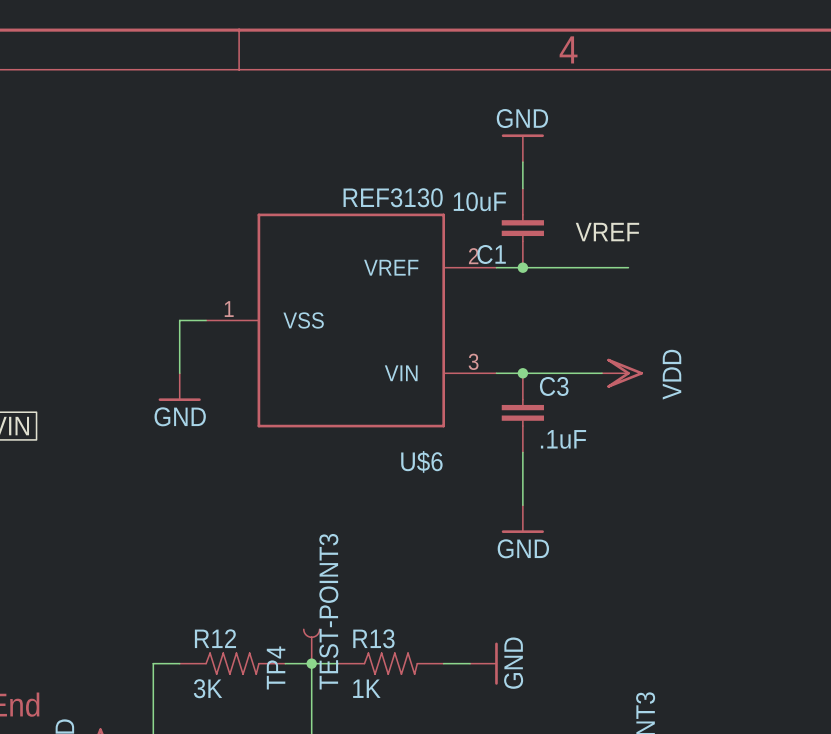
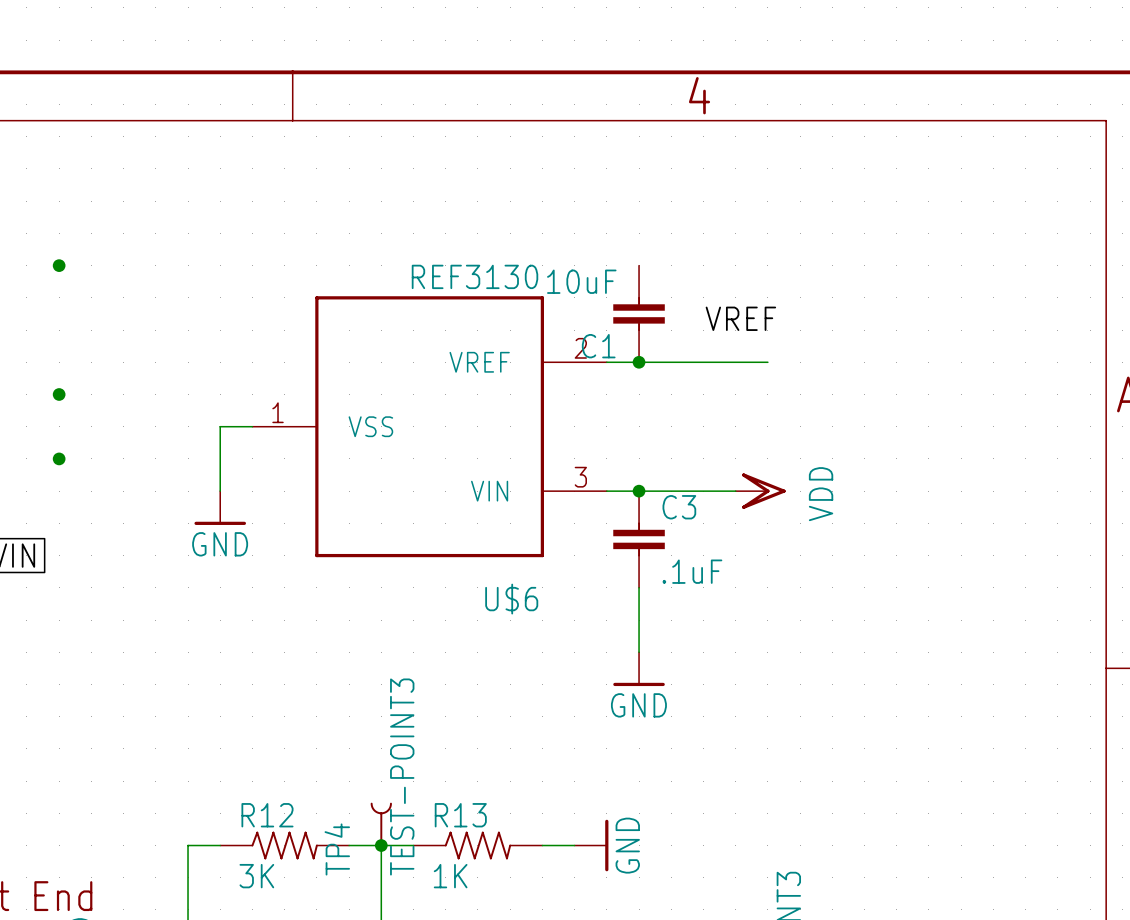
power symbol: GND (522, 148) -> none
wire: (522, 162) (522, 188) -> none
junction: none -> (59, 265)
junction: none -> (59, 394)
junction: none -> (59, 458)

